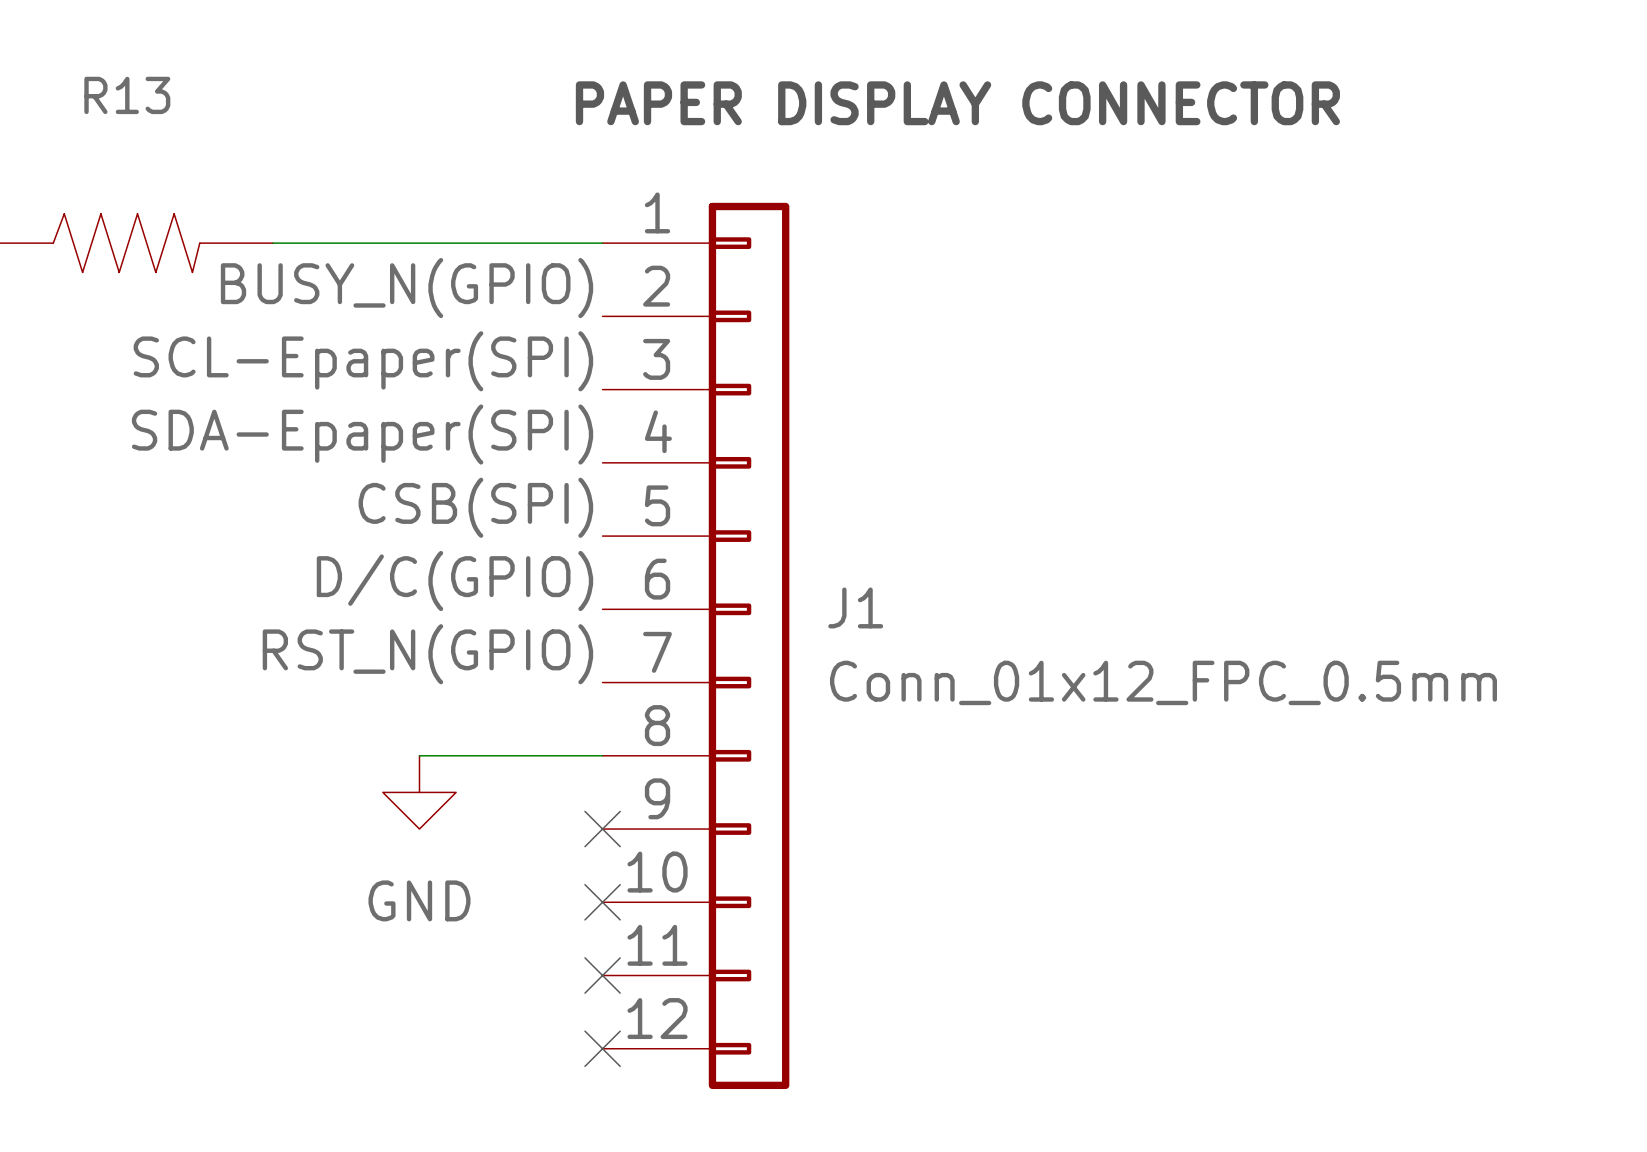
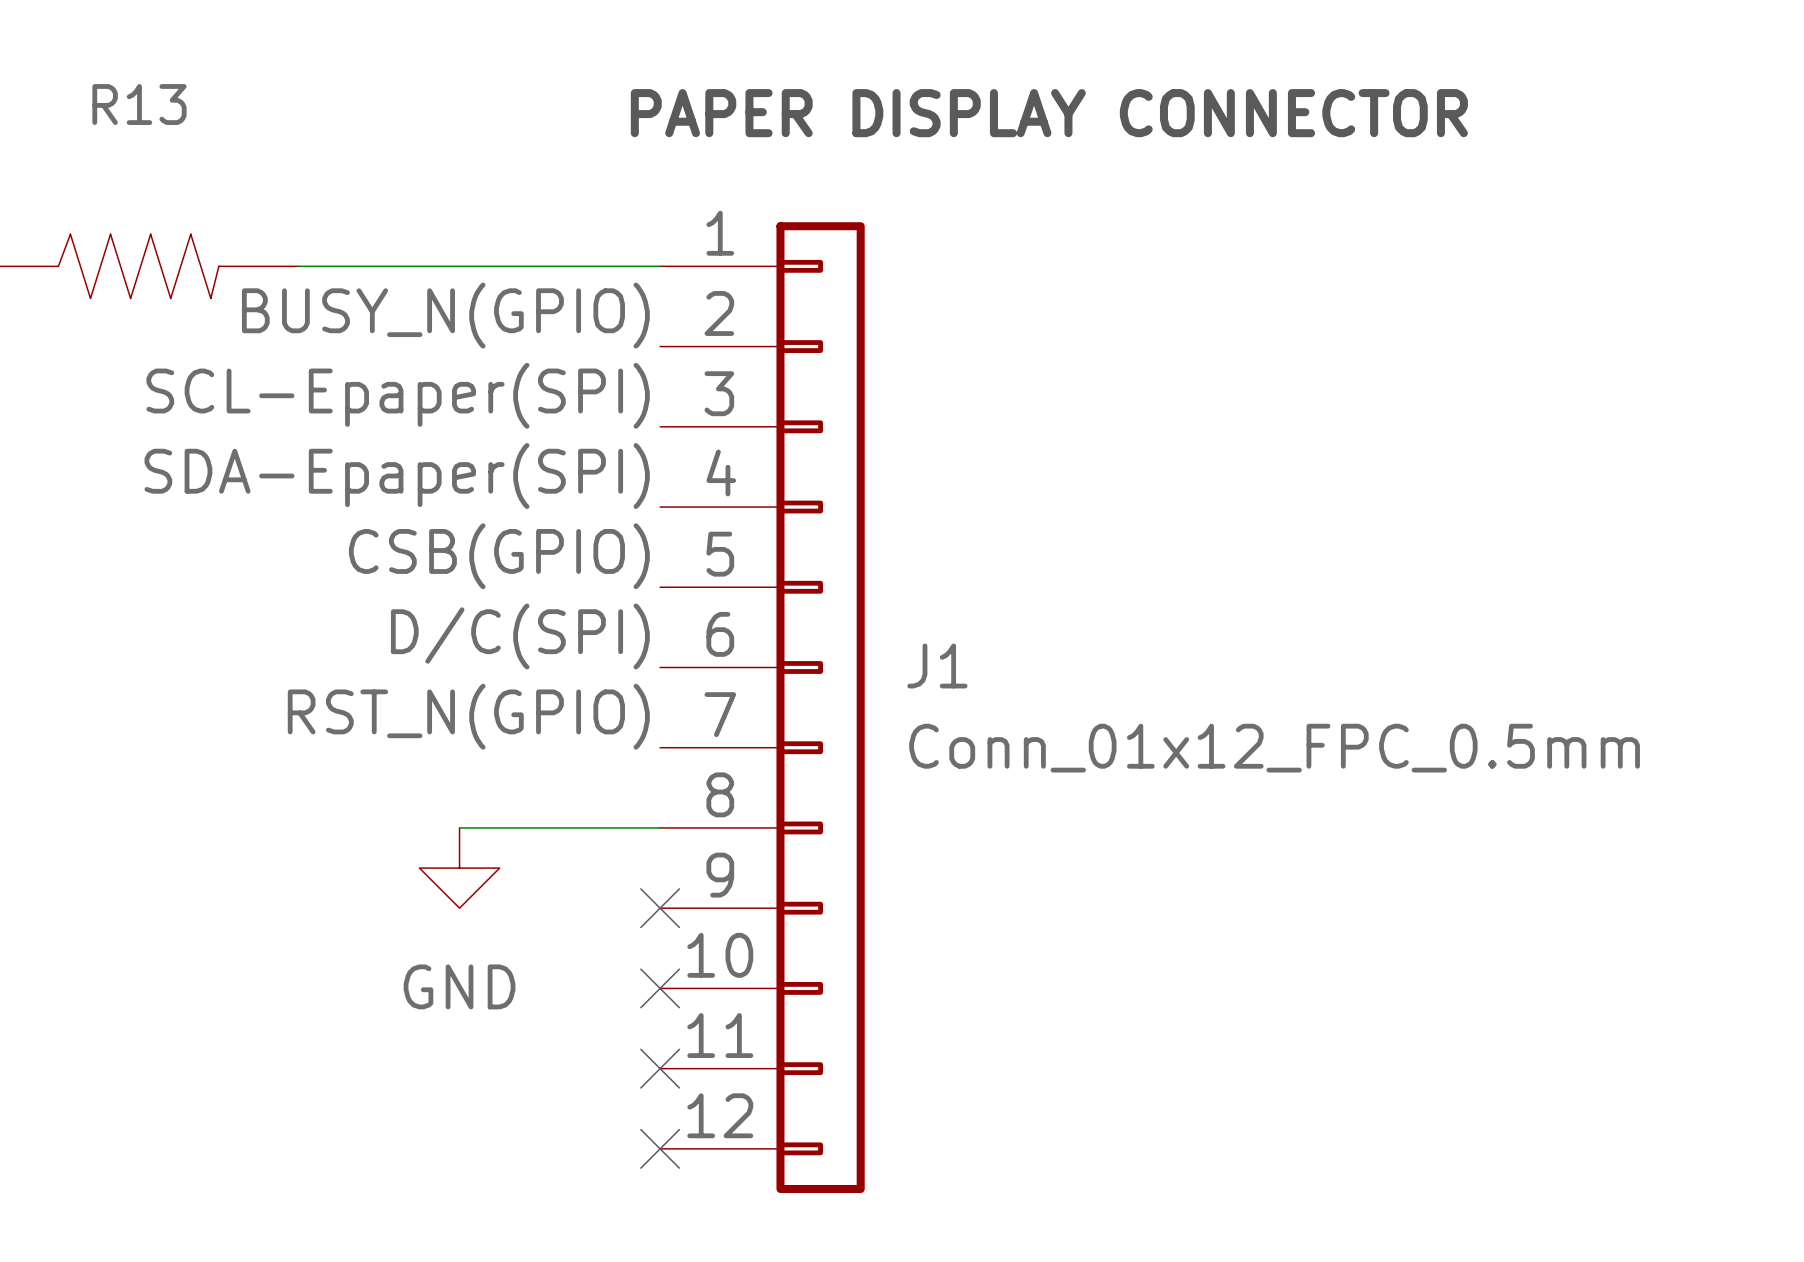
label: CSB(SPI) (475, 507) -> CSB(GPIO) (499, 556)
label: D/C(GPIO) (454, 581) -> D/C(SPI) (520, 636)

